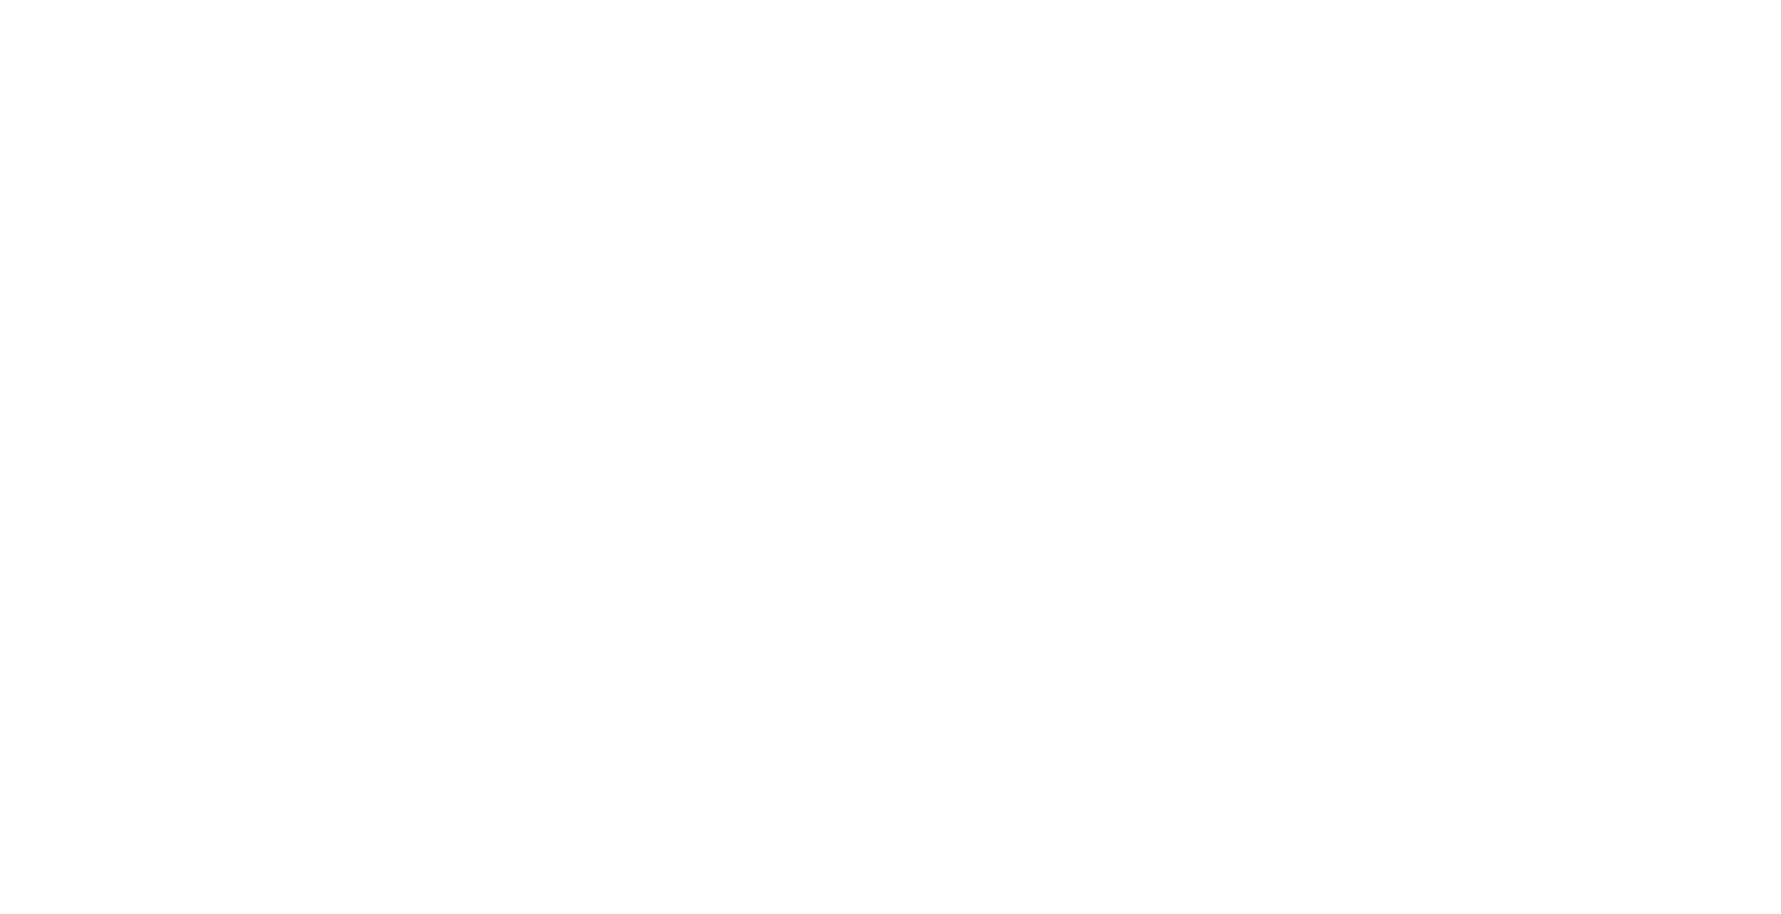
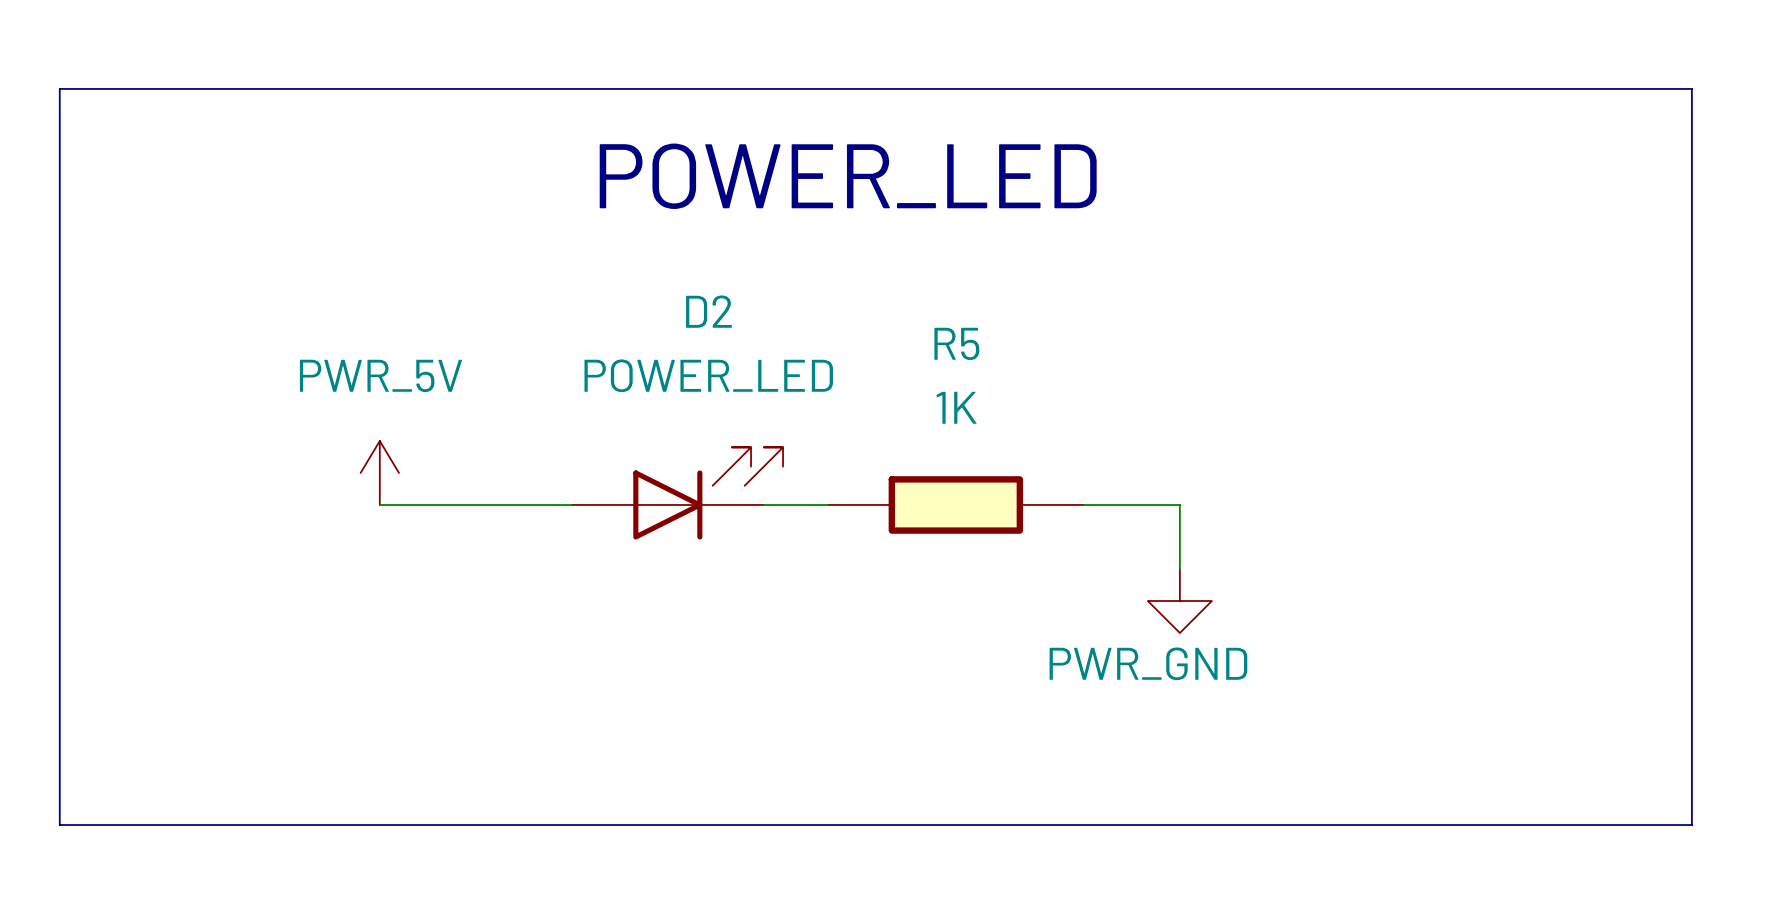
line: none -> (59, 88) (1691, 88) (1691, 825) (59, 825) (59, 88)
text: none -> POWER_LED (848, 176)
power symbol: none -> PWR_5V (379, 472)
D2: none -> POWER_LED (677, 493)
wire: none -> (379, 504) (571, 504)
wire: none -> (763, 504) (827, 504)
R5: none -> 1K (955, 504)
wire: none -> (1083, 504) (1179, 504) (1179, 568)
power symbol: none -> PWR_GND (1179, 601)

